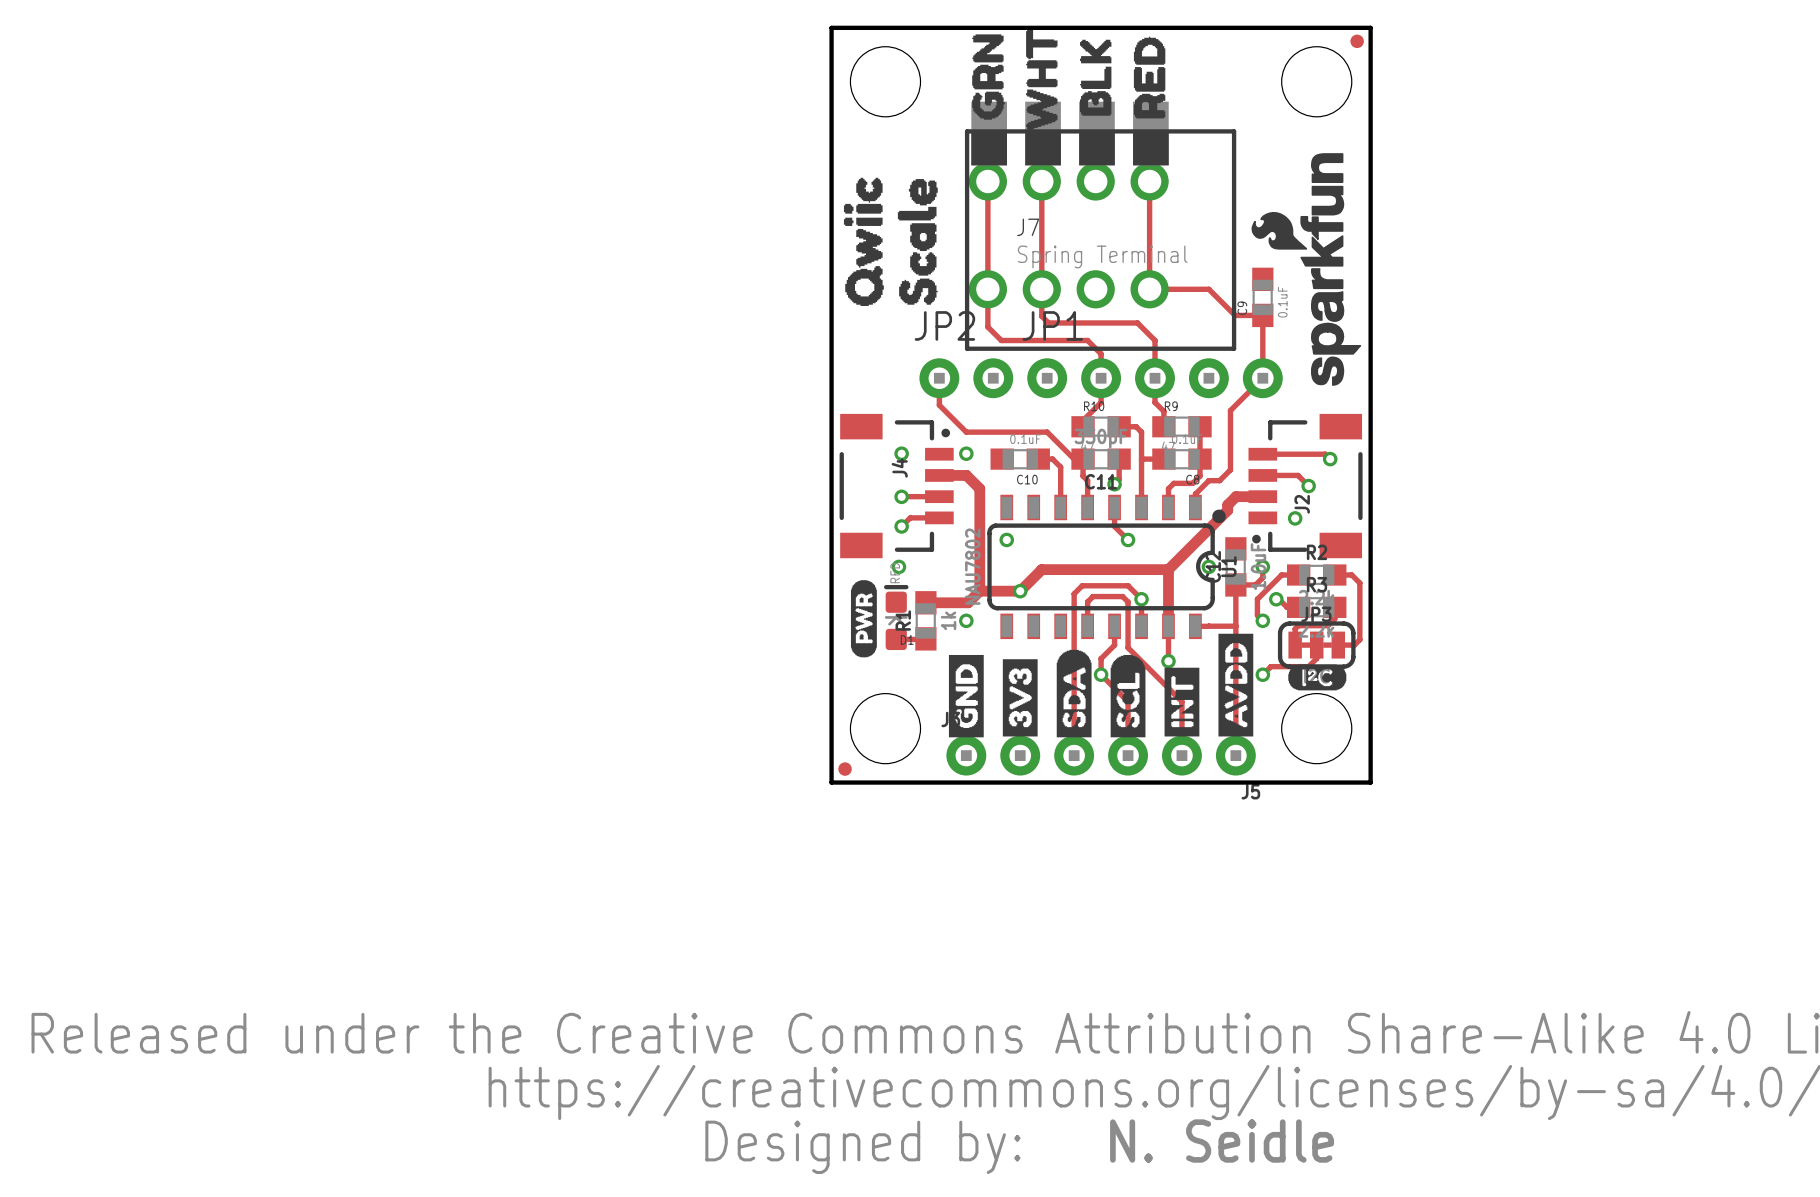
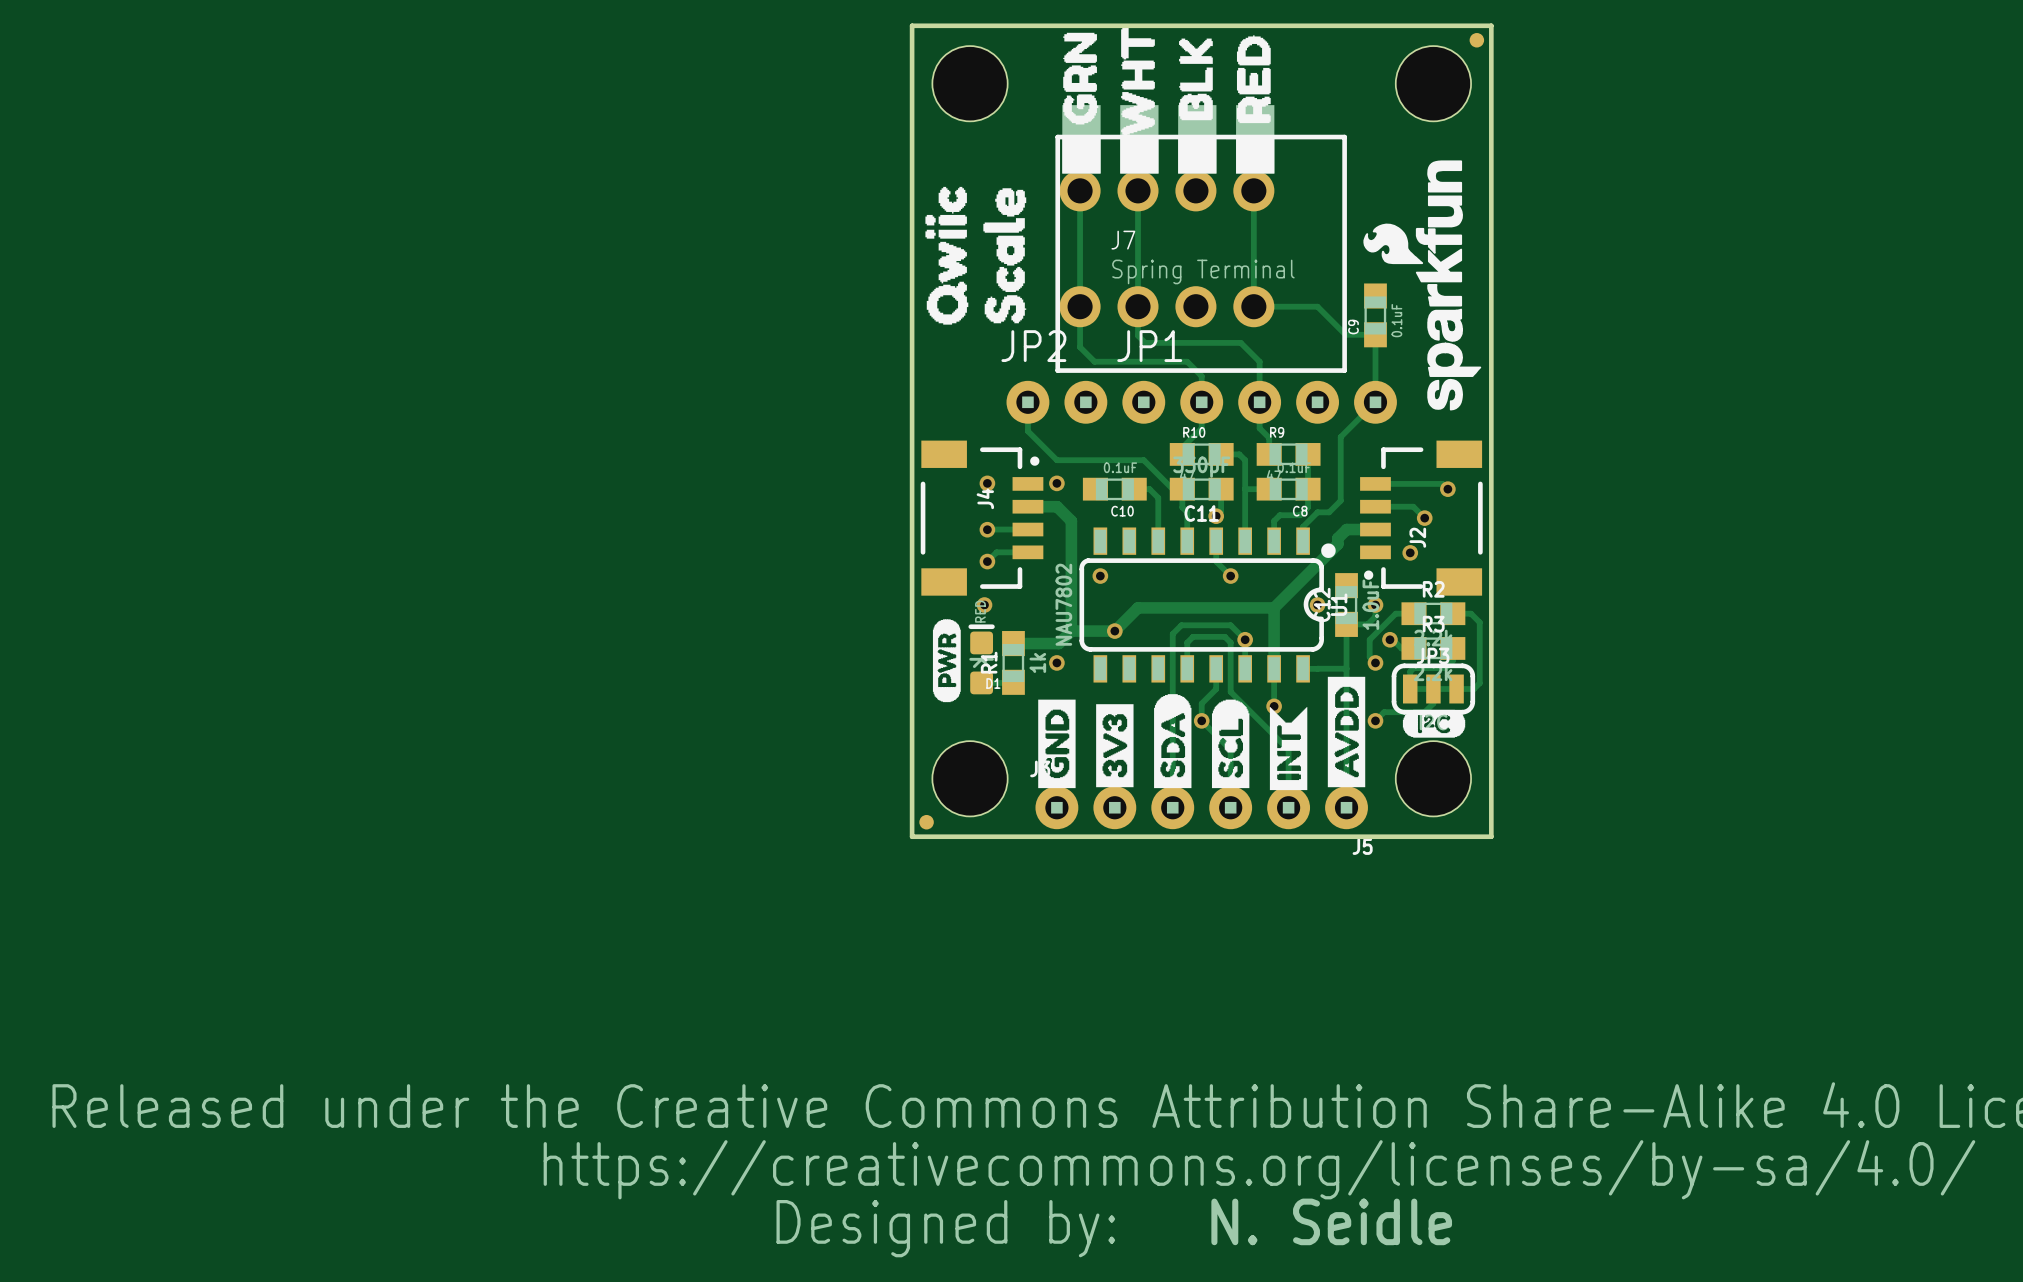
drawing shape: [1164, 667, 1200, 737] -> [1269, 707, 1308, 791]

